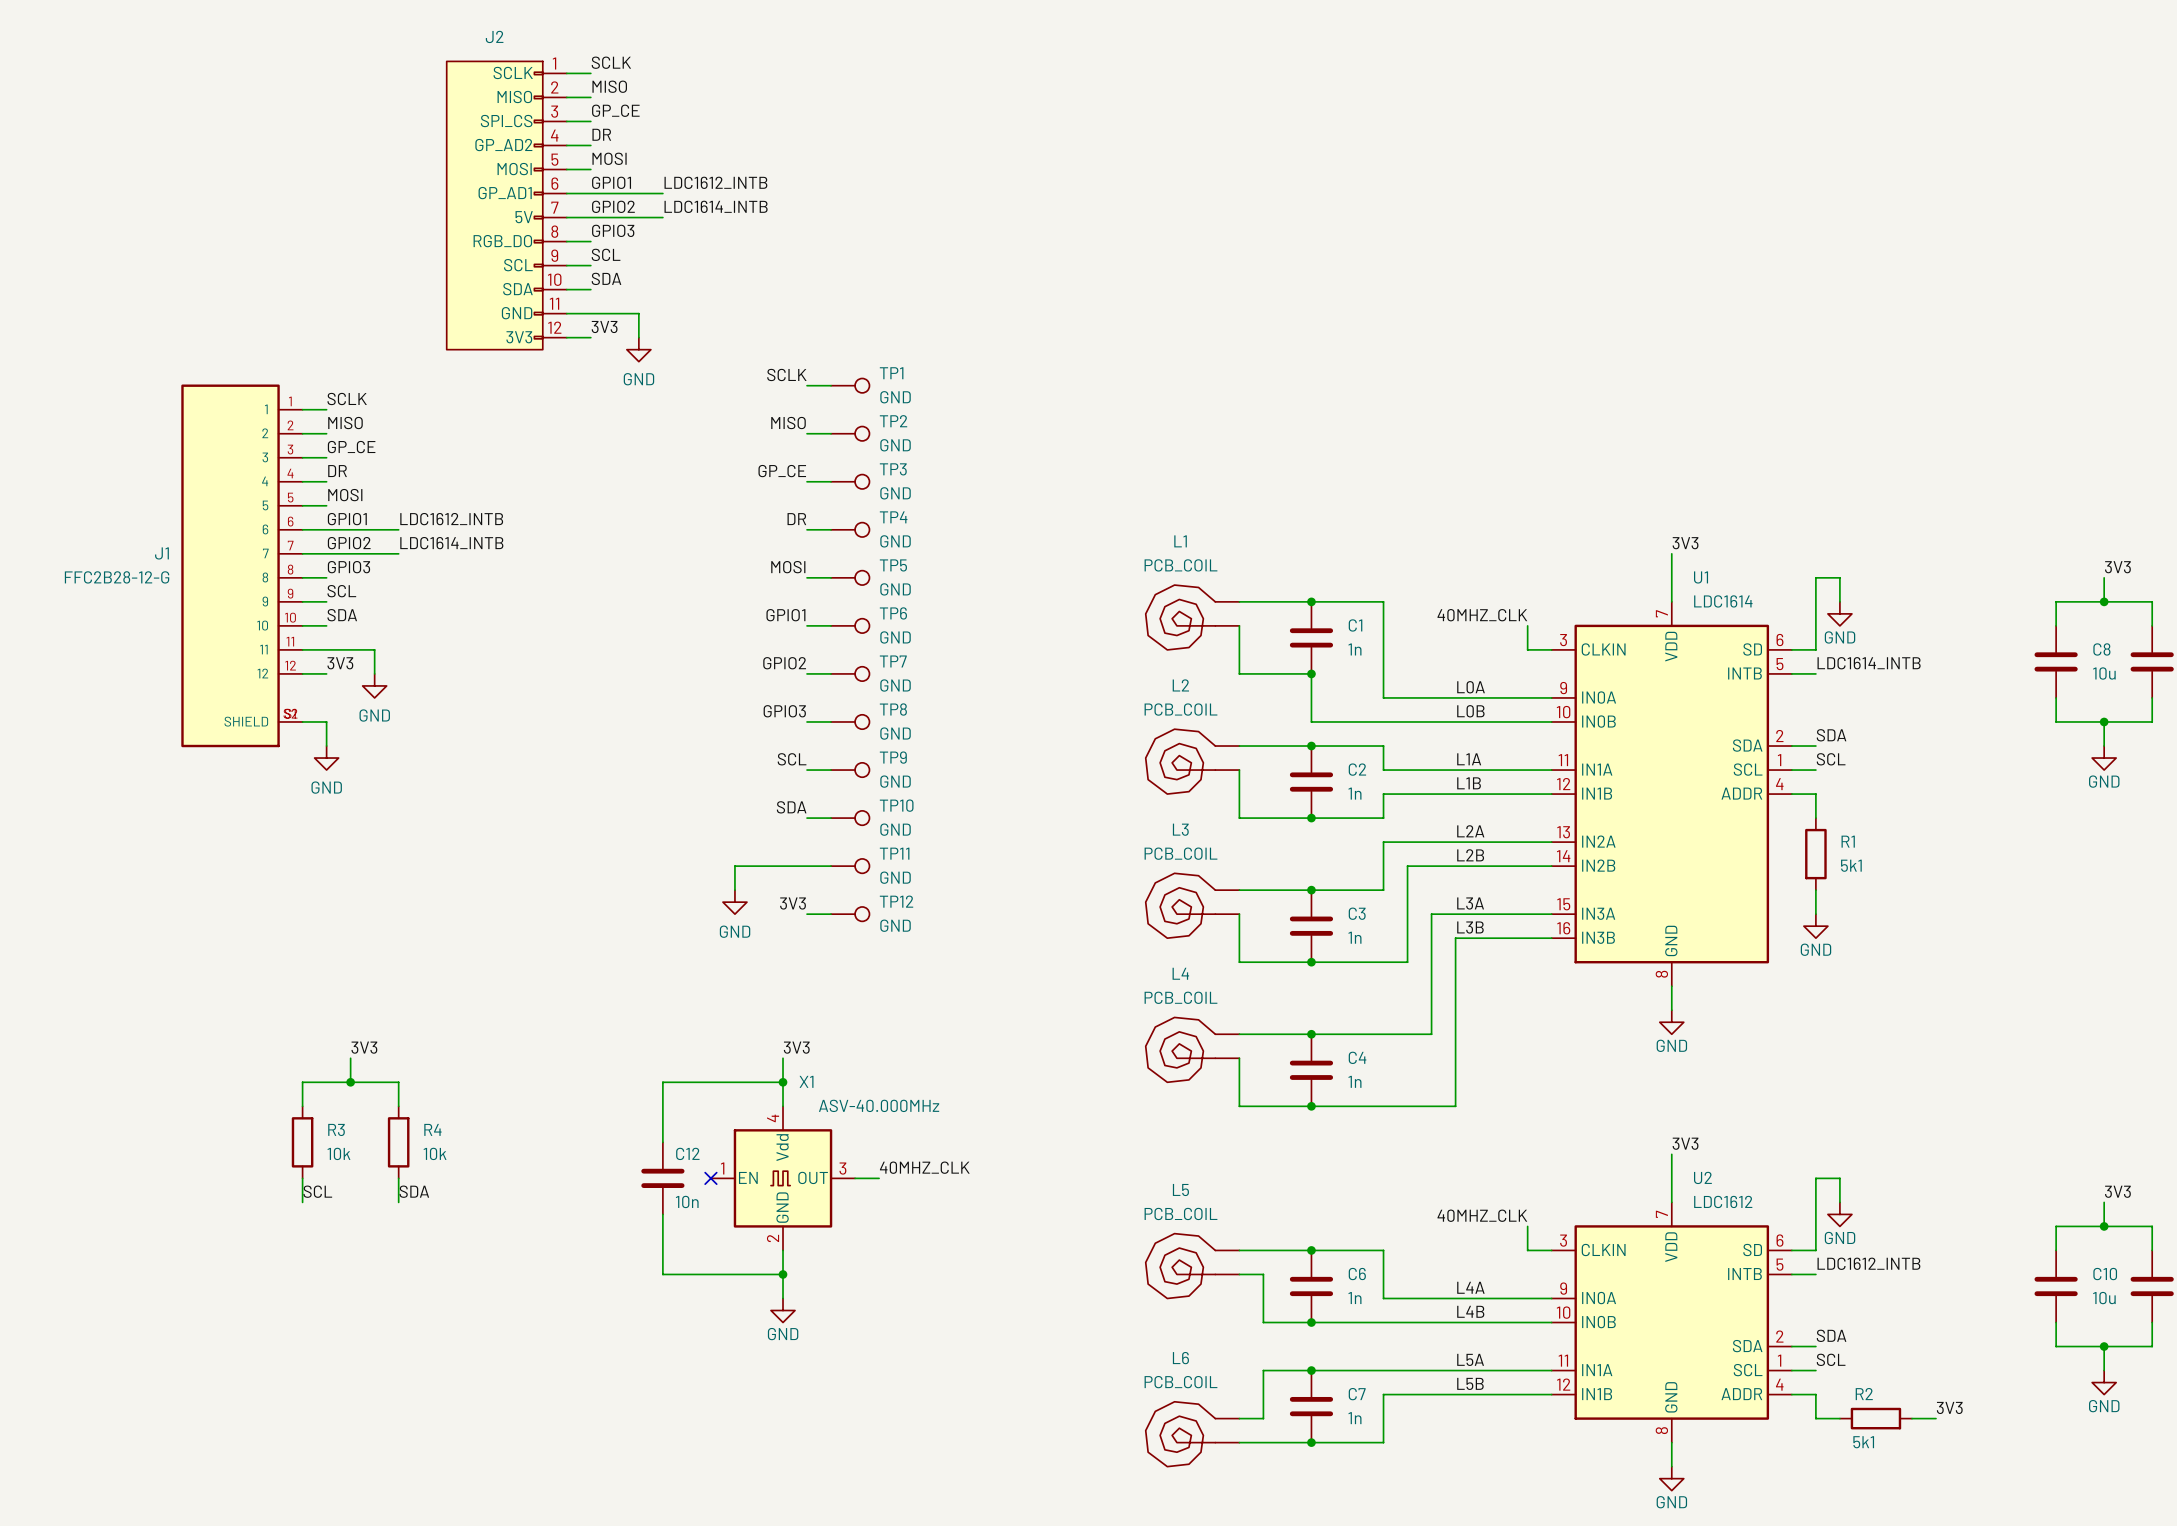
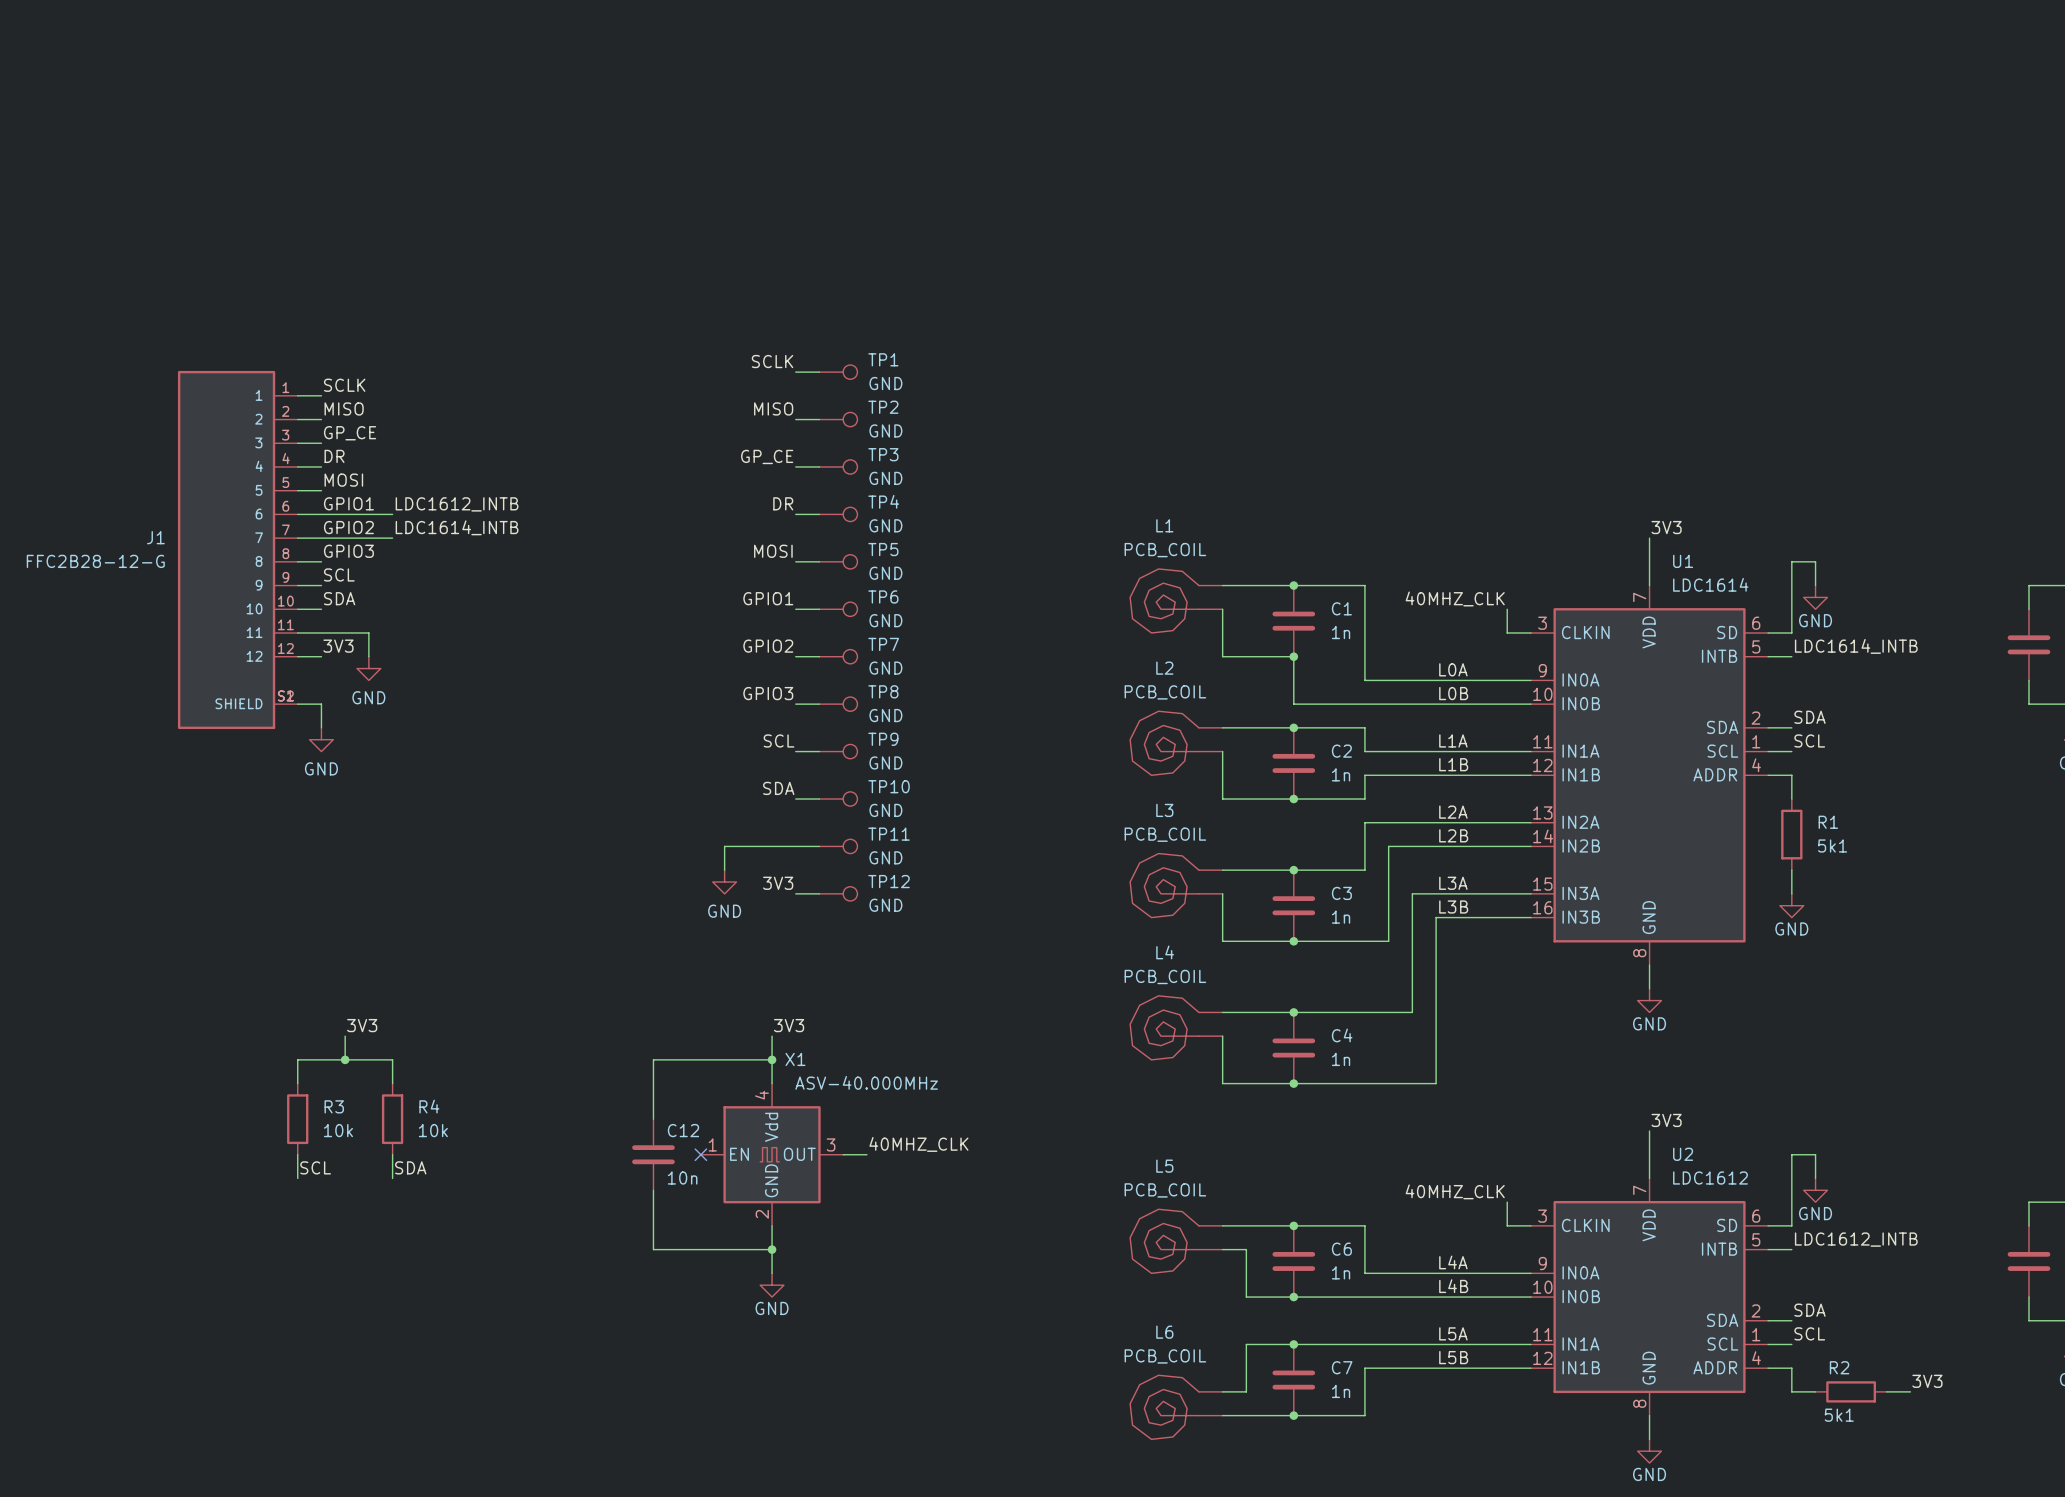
label: SCLK (611, 62) -> none
wire: (566, 73) (590, 73) -> none
label: MISO (609, 86) -> none
wire: (566, 97) (590, 97) -> none
label: GP_CE (615, 110) -> none
wire: (566, 121) (590, 121) -> none
label: DR (601, 134) -> none
wire: (566, 145) (590, 145) -> none
label: MOSI (609, 158) -> none
wire: (566, 169) (590, 169) -> none
label: GPIO1 (611, 182) -> none
label: LDC1612_INTB (715, 182) -> none
wire: (566, 193) (662, 193) -> none
J2: (506, 205) -> none
label: GPIO2 (613, 206) -> none
label: LDC1614_INTB (716, 206) -> none
wire: (566, 217) (662, 217) -> none
label: GPIO3 (613, 230) -> none
wire: (566, 241) (590, 241) -> none
label: SCL (606, 254) -> none
wire: (566, 265) (590, 265) -> none
label: SDA (606, 278) -> none
wire: (566, 289) (590, 289) -> none
wire: (566, 313) (638, 313) (638, 337) -> none
label: 3V3 (604, 327) -> none
wire: (566, 337) (590, 337) -> none
power symbol: GND (638, 349) -> none

